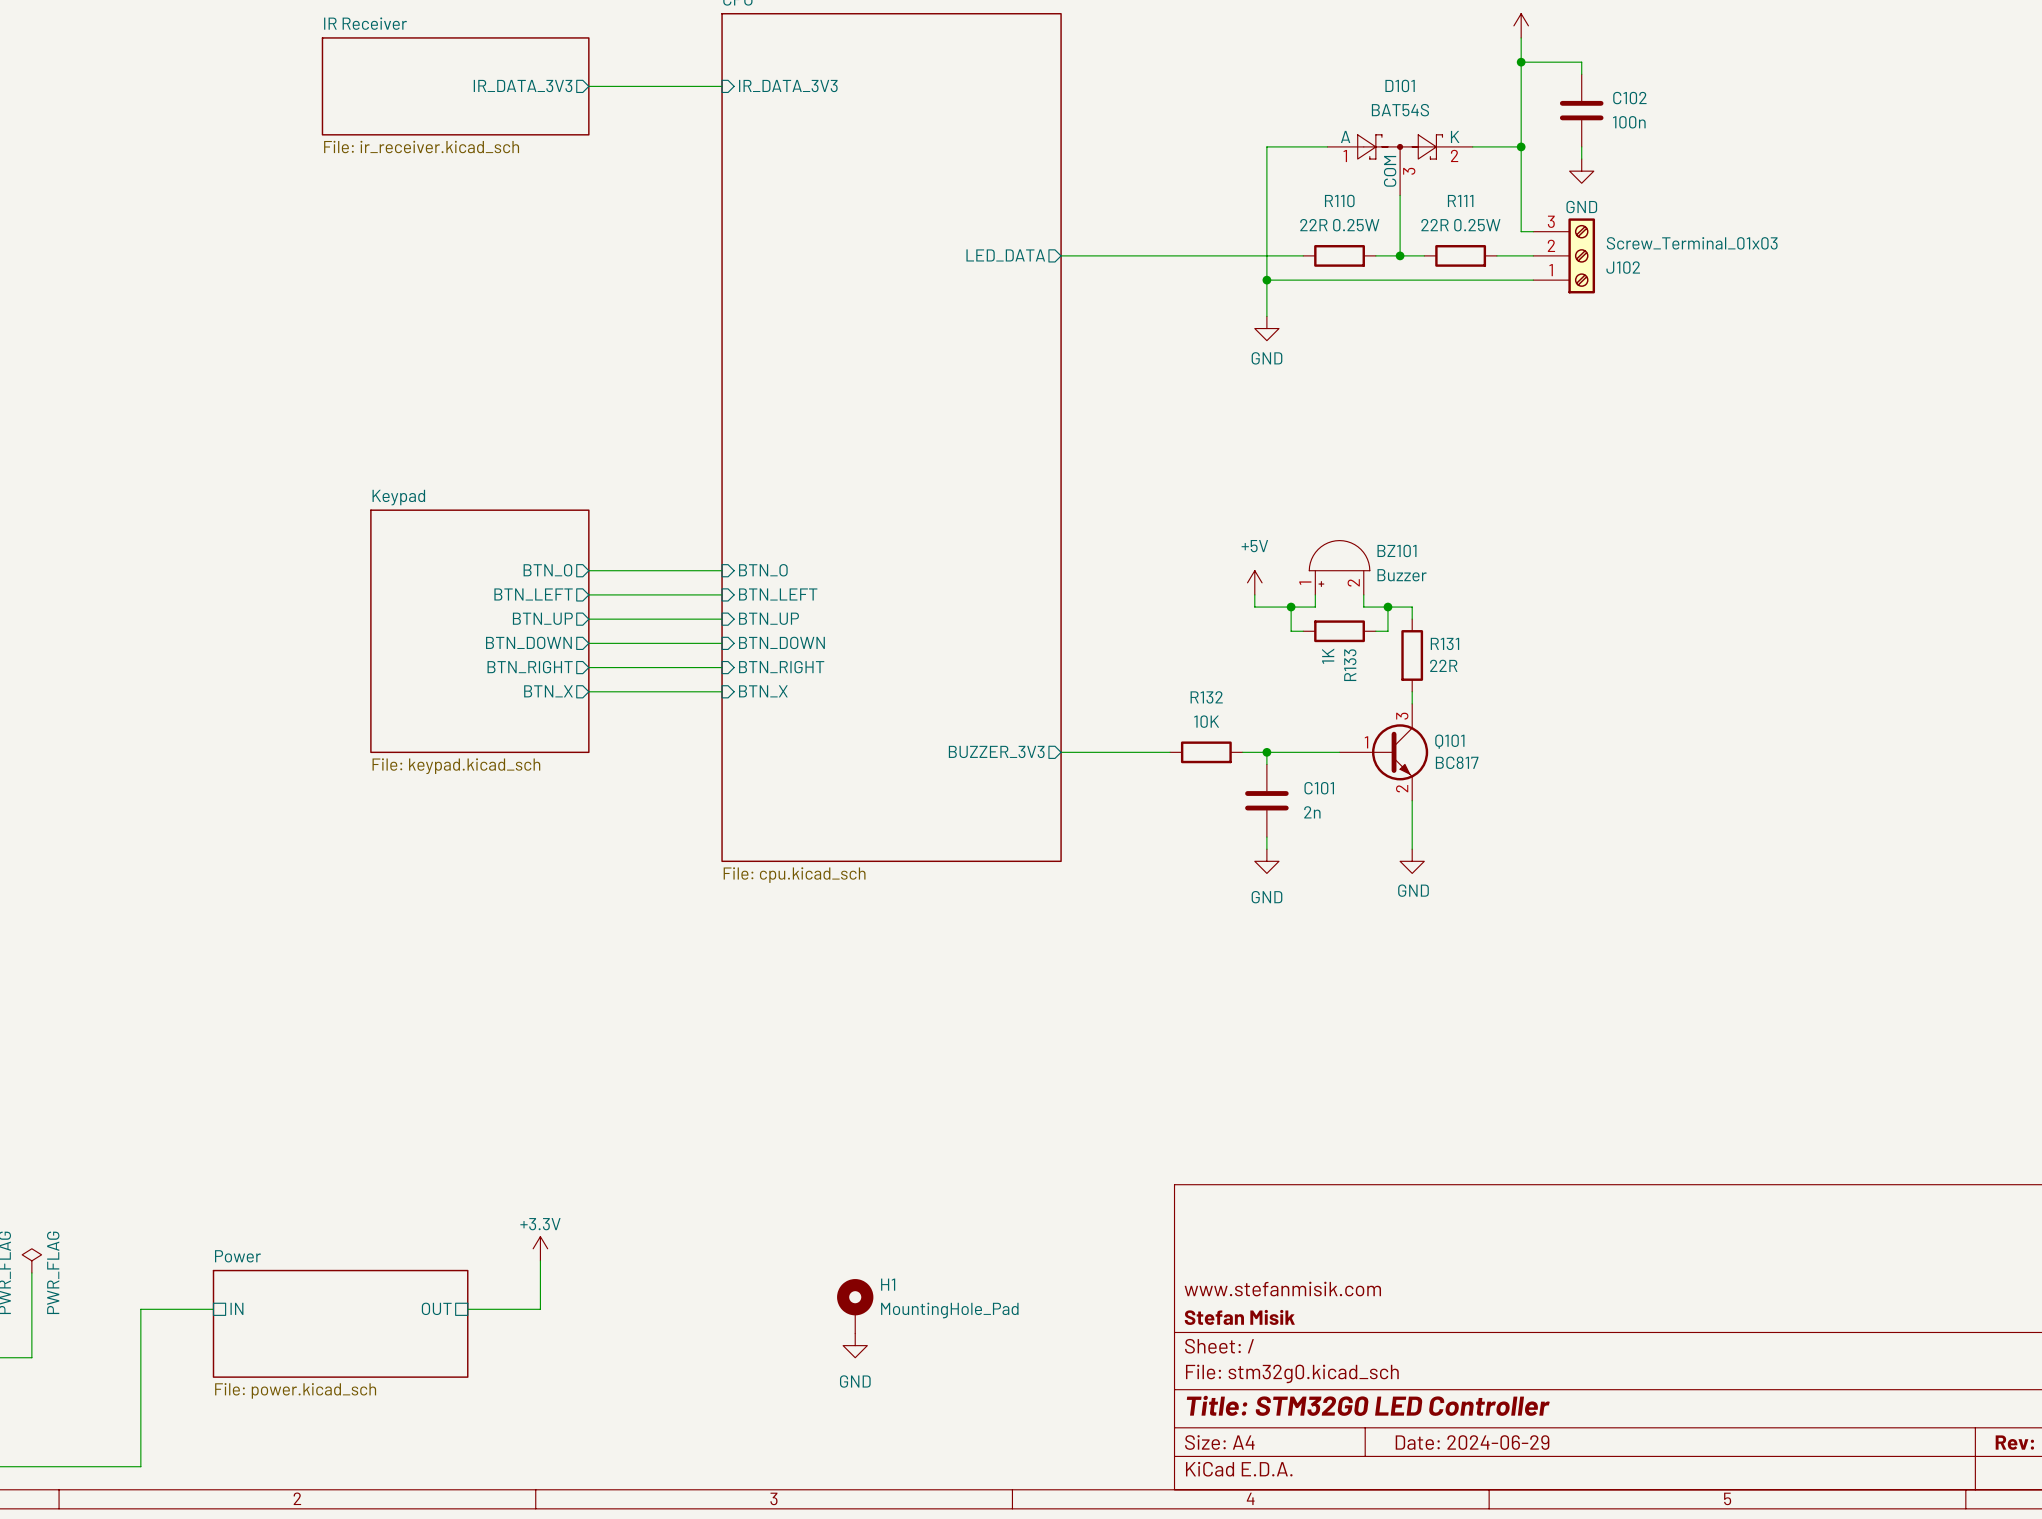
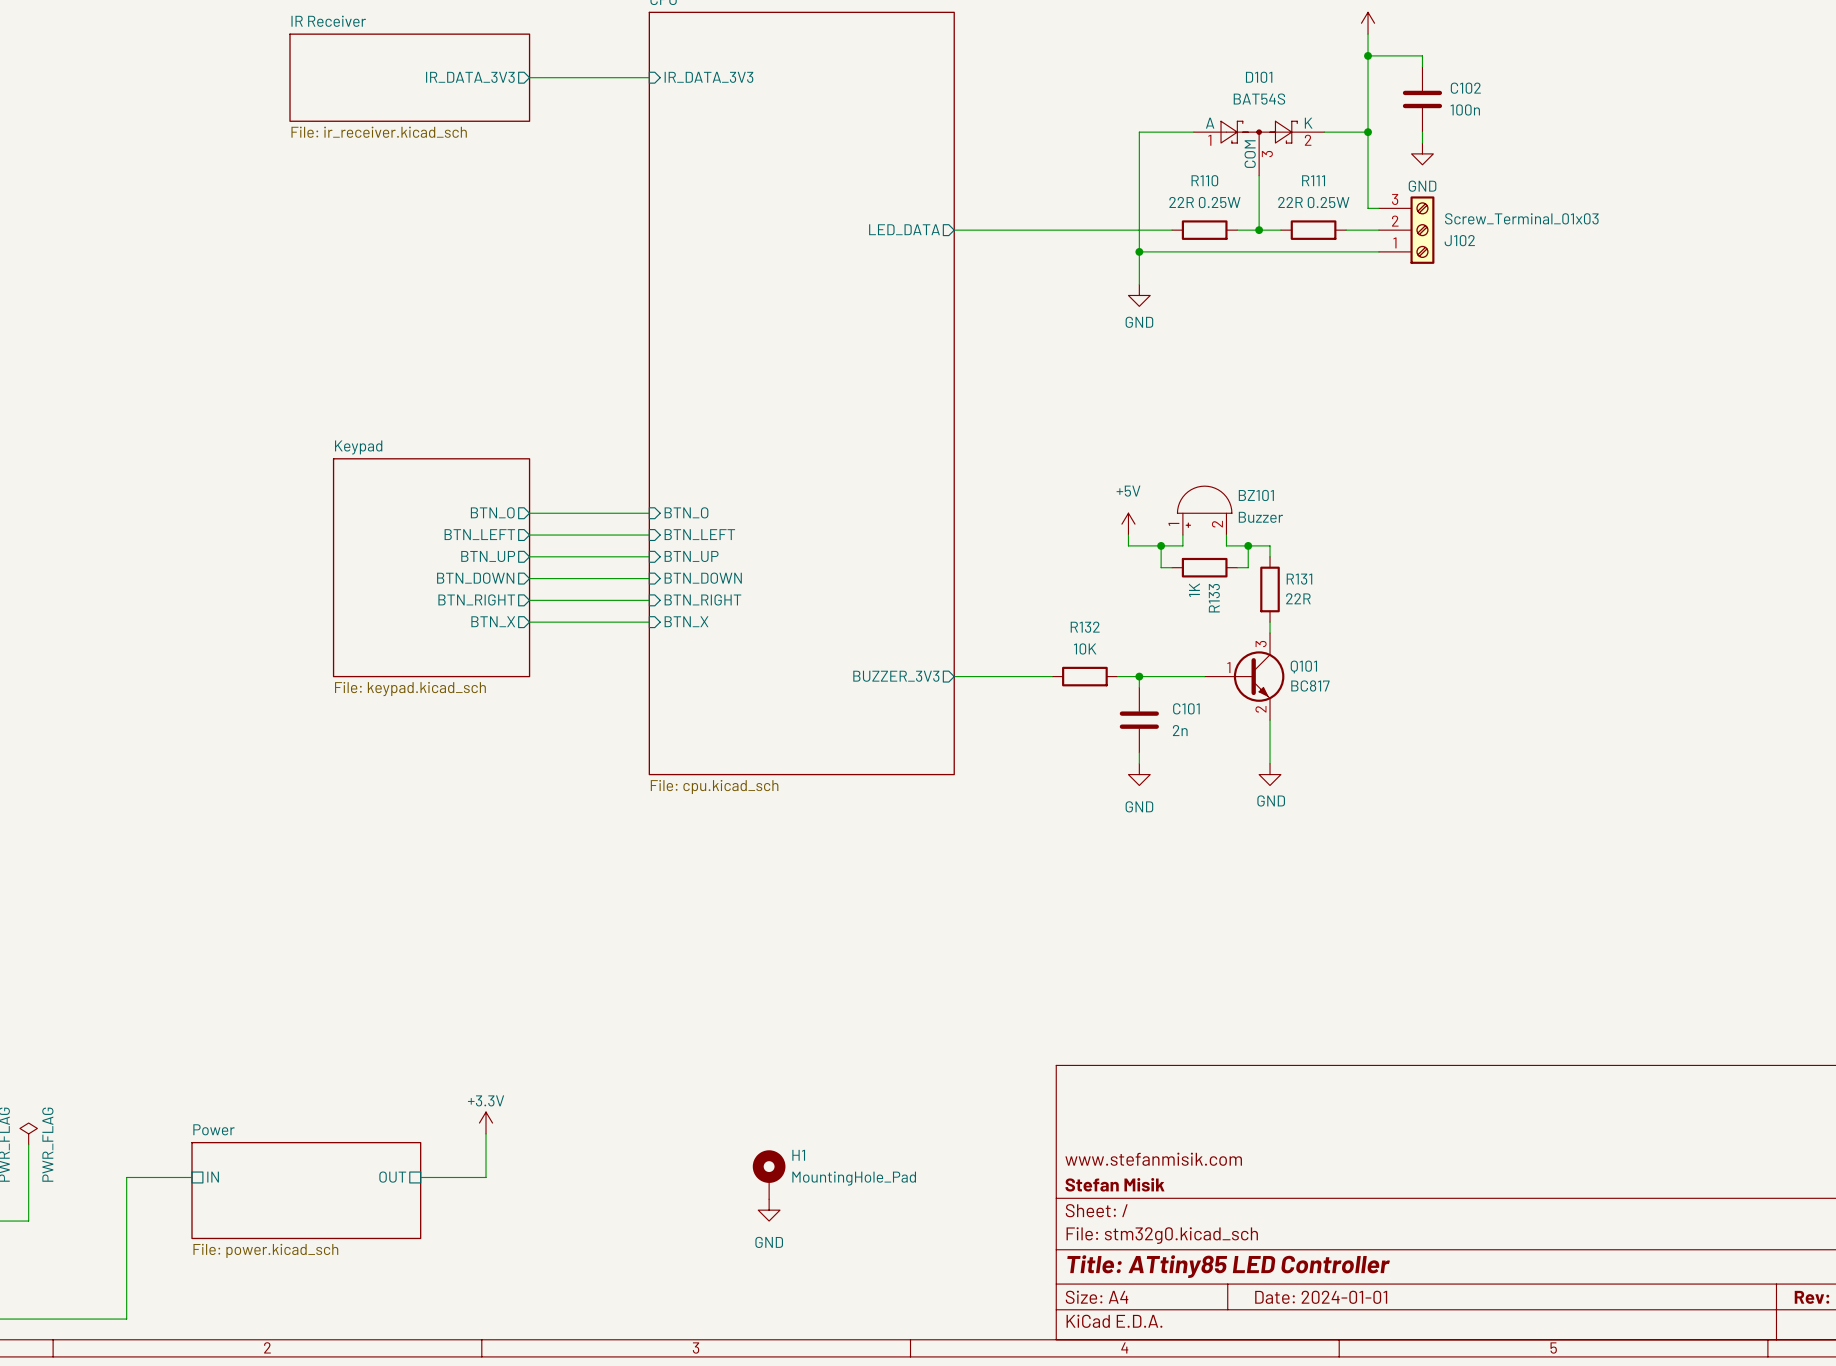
title block: Title: STM32G0 LED Controller (1368, 1405) -> Title: ATtiny85 LED Controller (1228, 1266)
title block: Date: 2024-06-29 (1472, 1442) -> Date: 2024-01-01 (1321, 1297)

